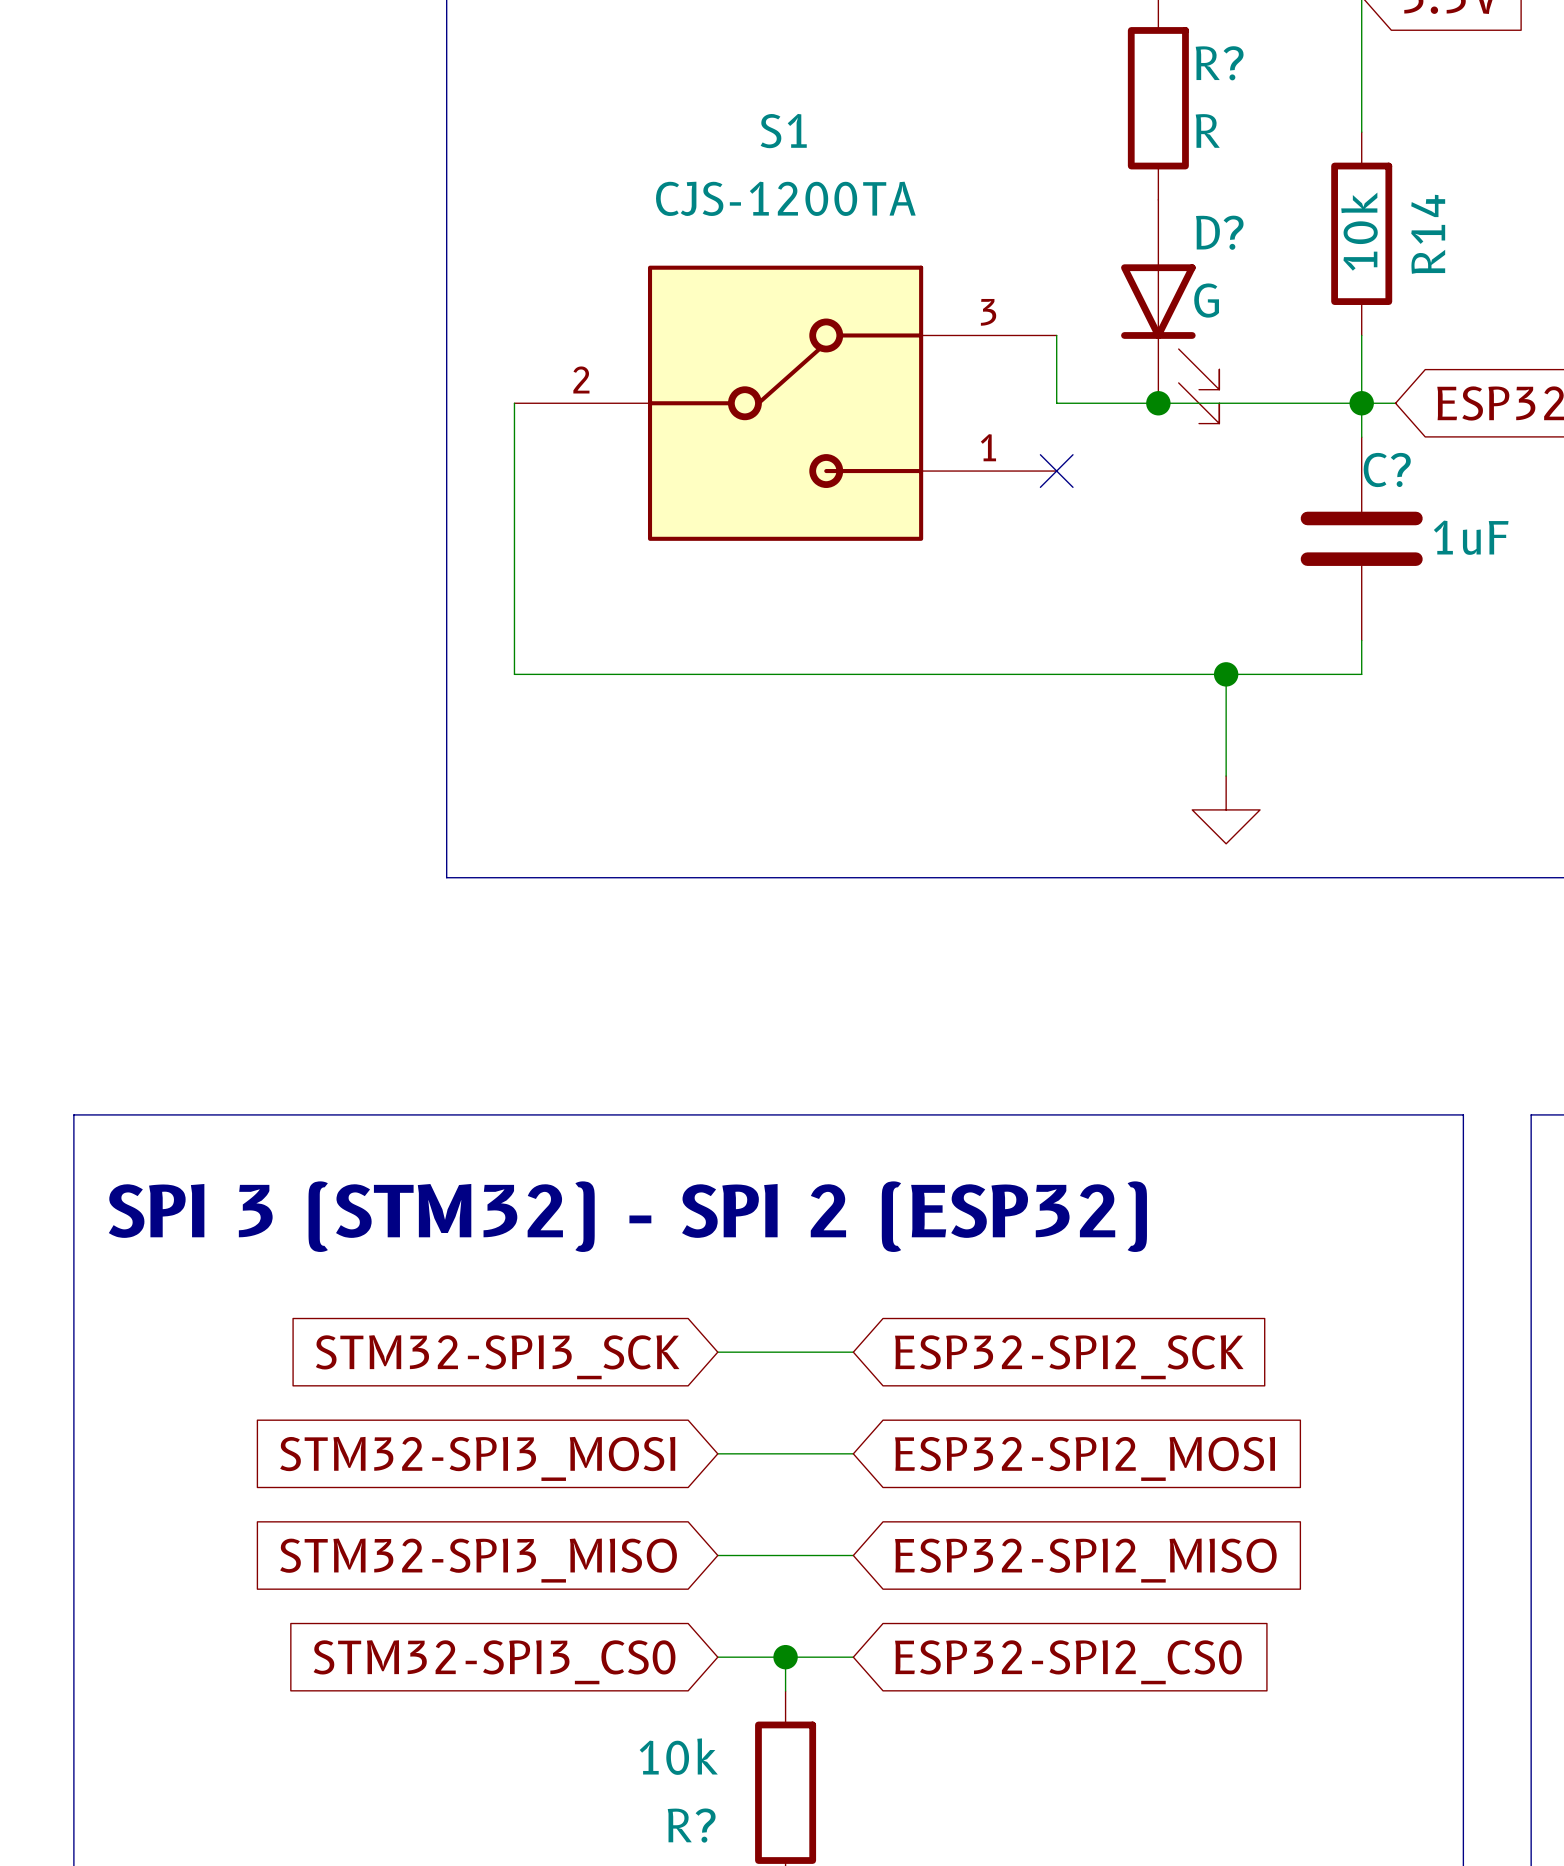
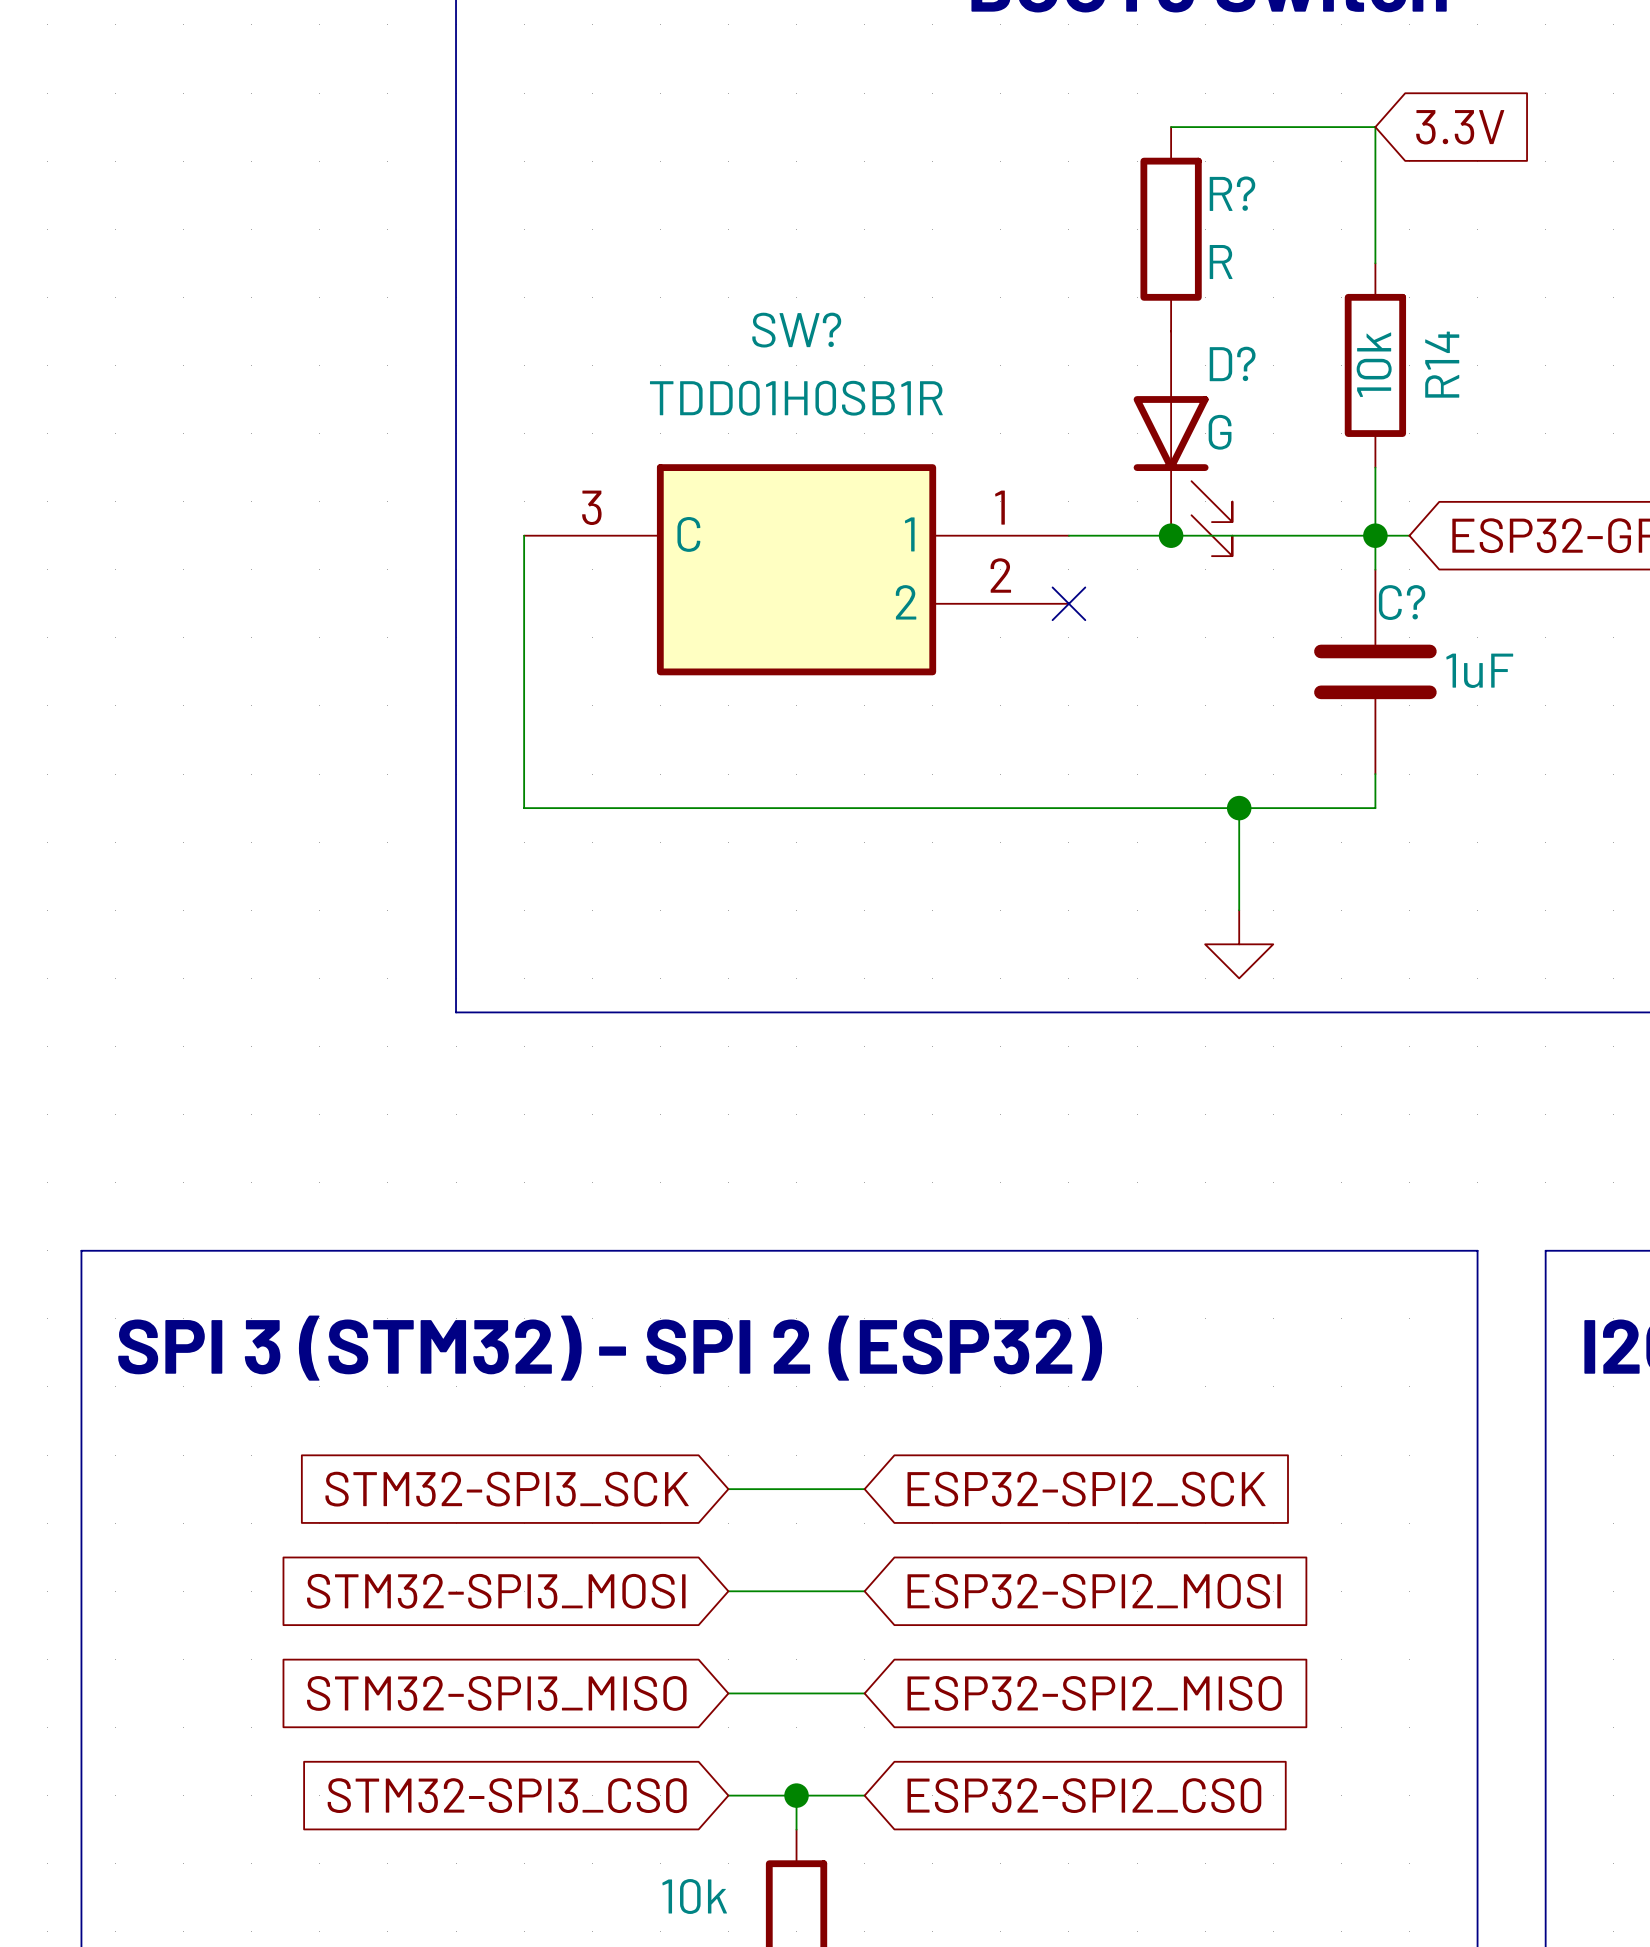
wire: (1056, 335) (1056, 403) -> none
S1: CJS-1200TA (785, 403) -> none
SW?: none -> TDD01H0SB1R (796, 569)

